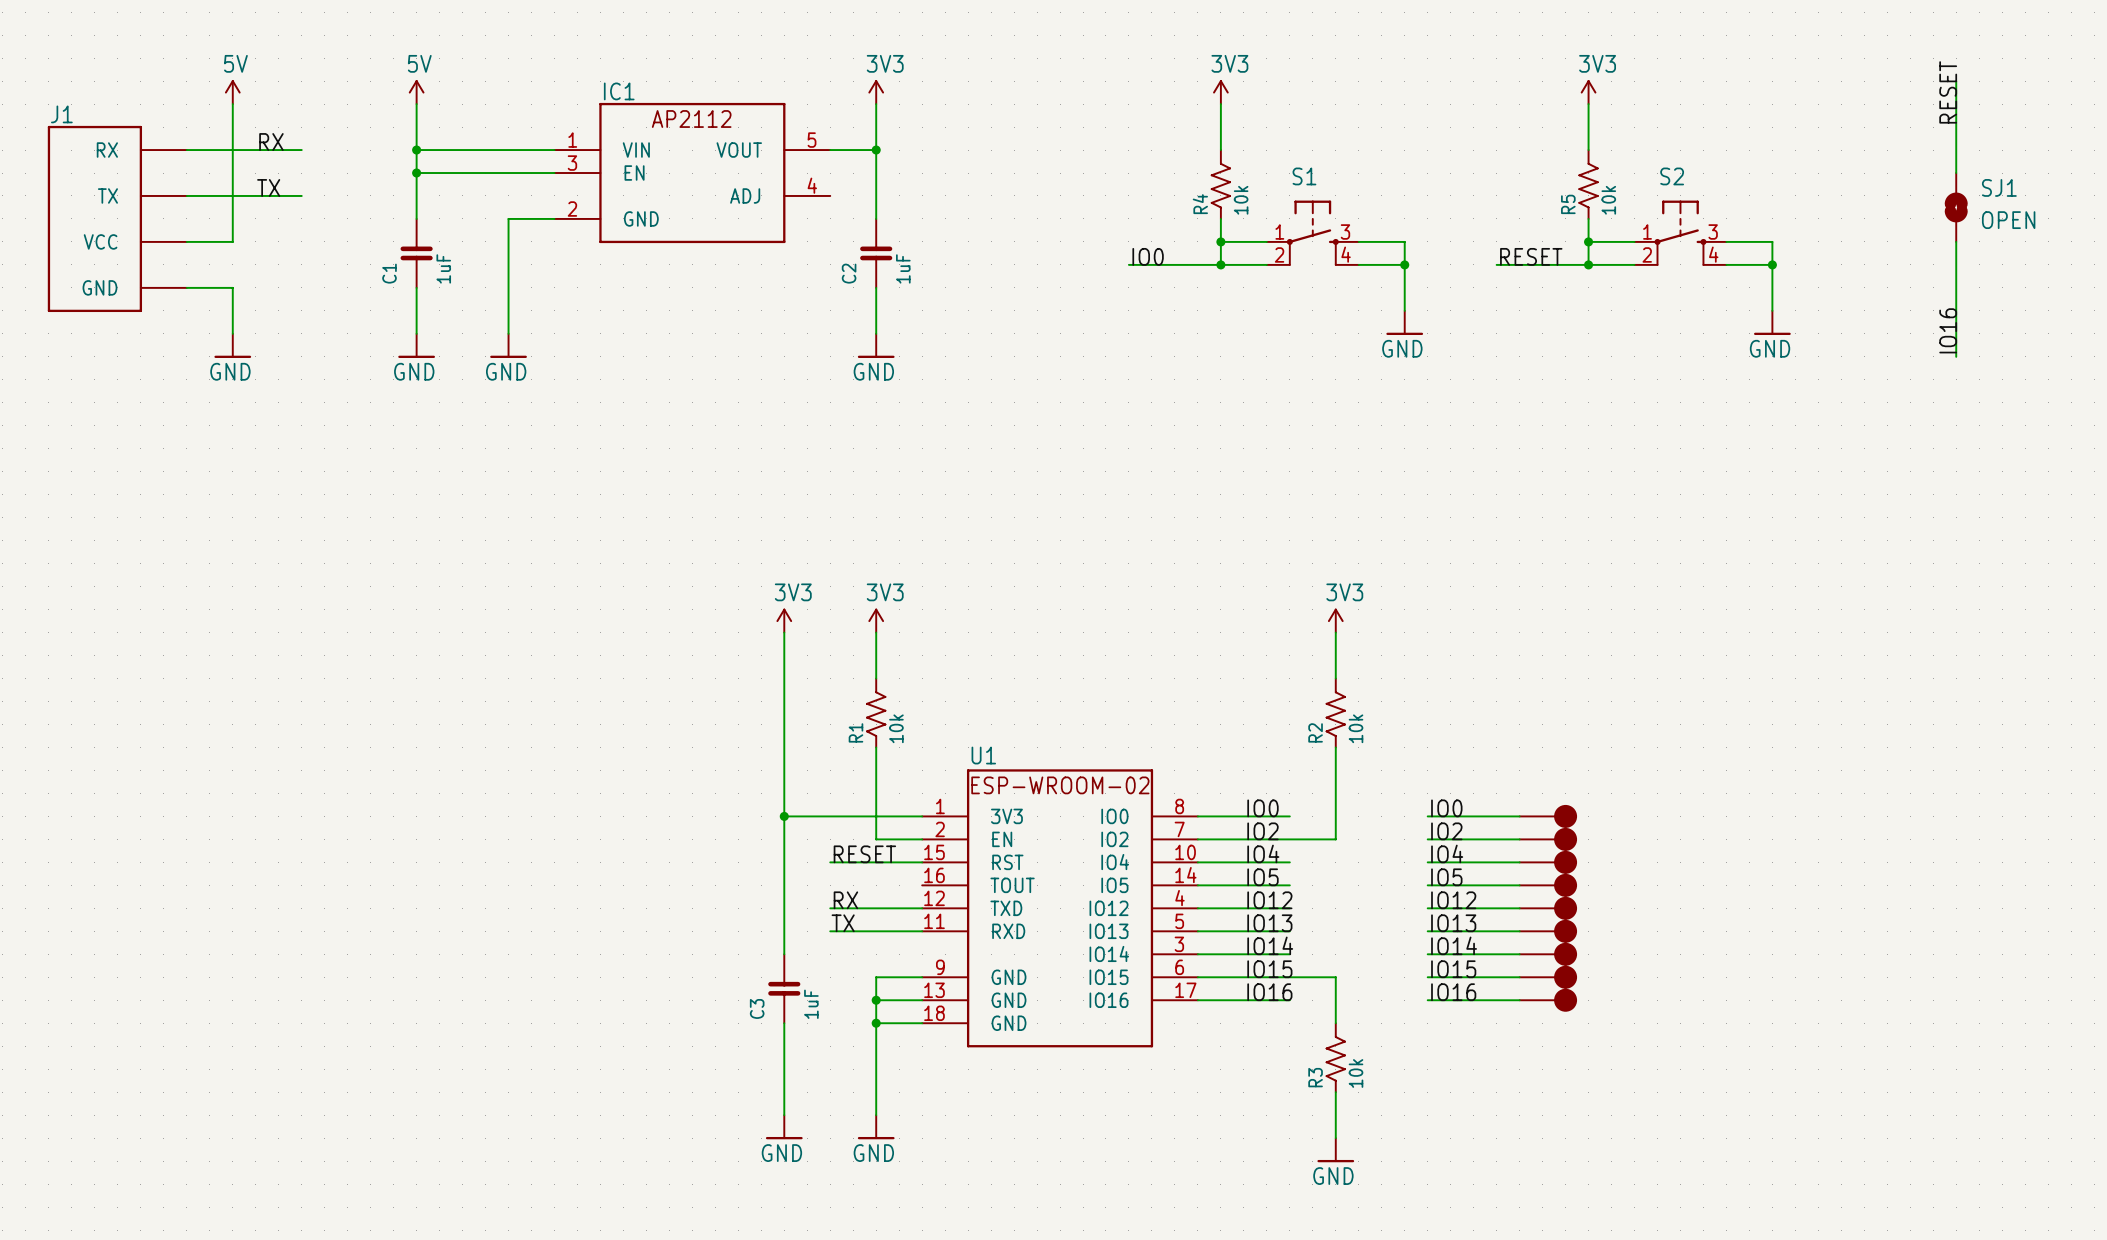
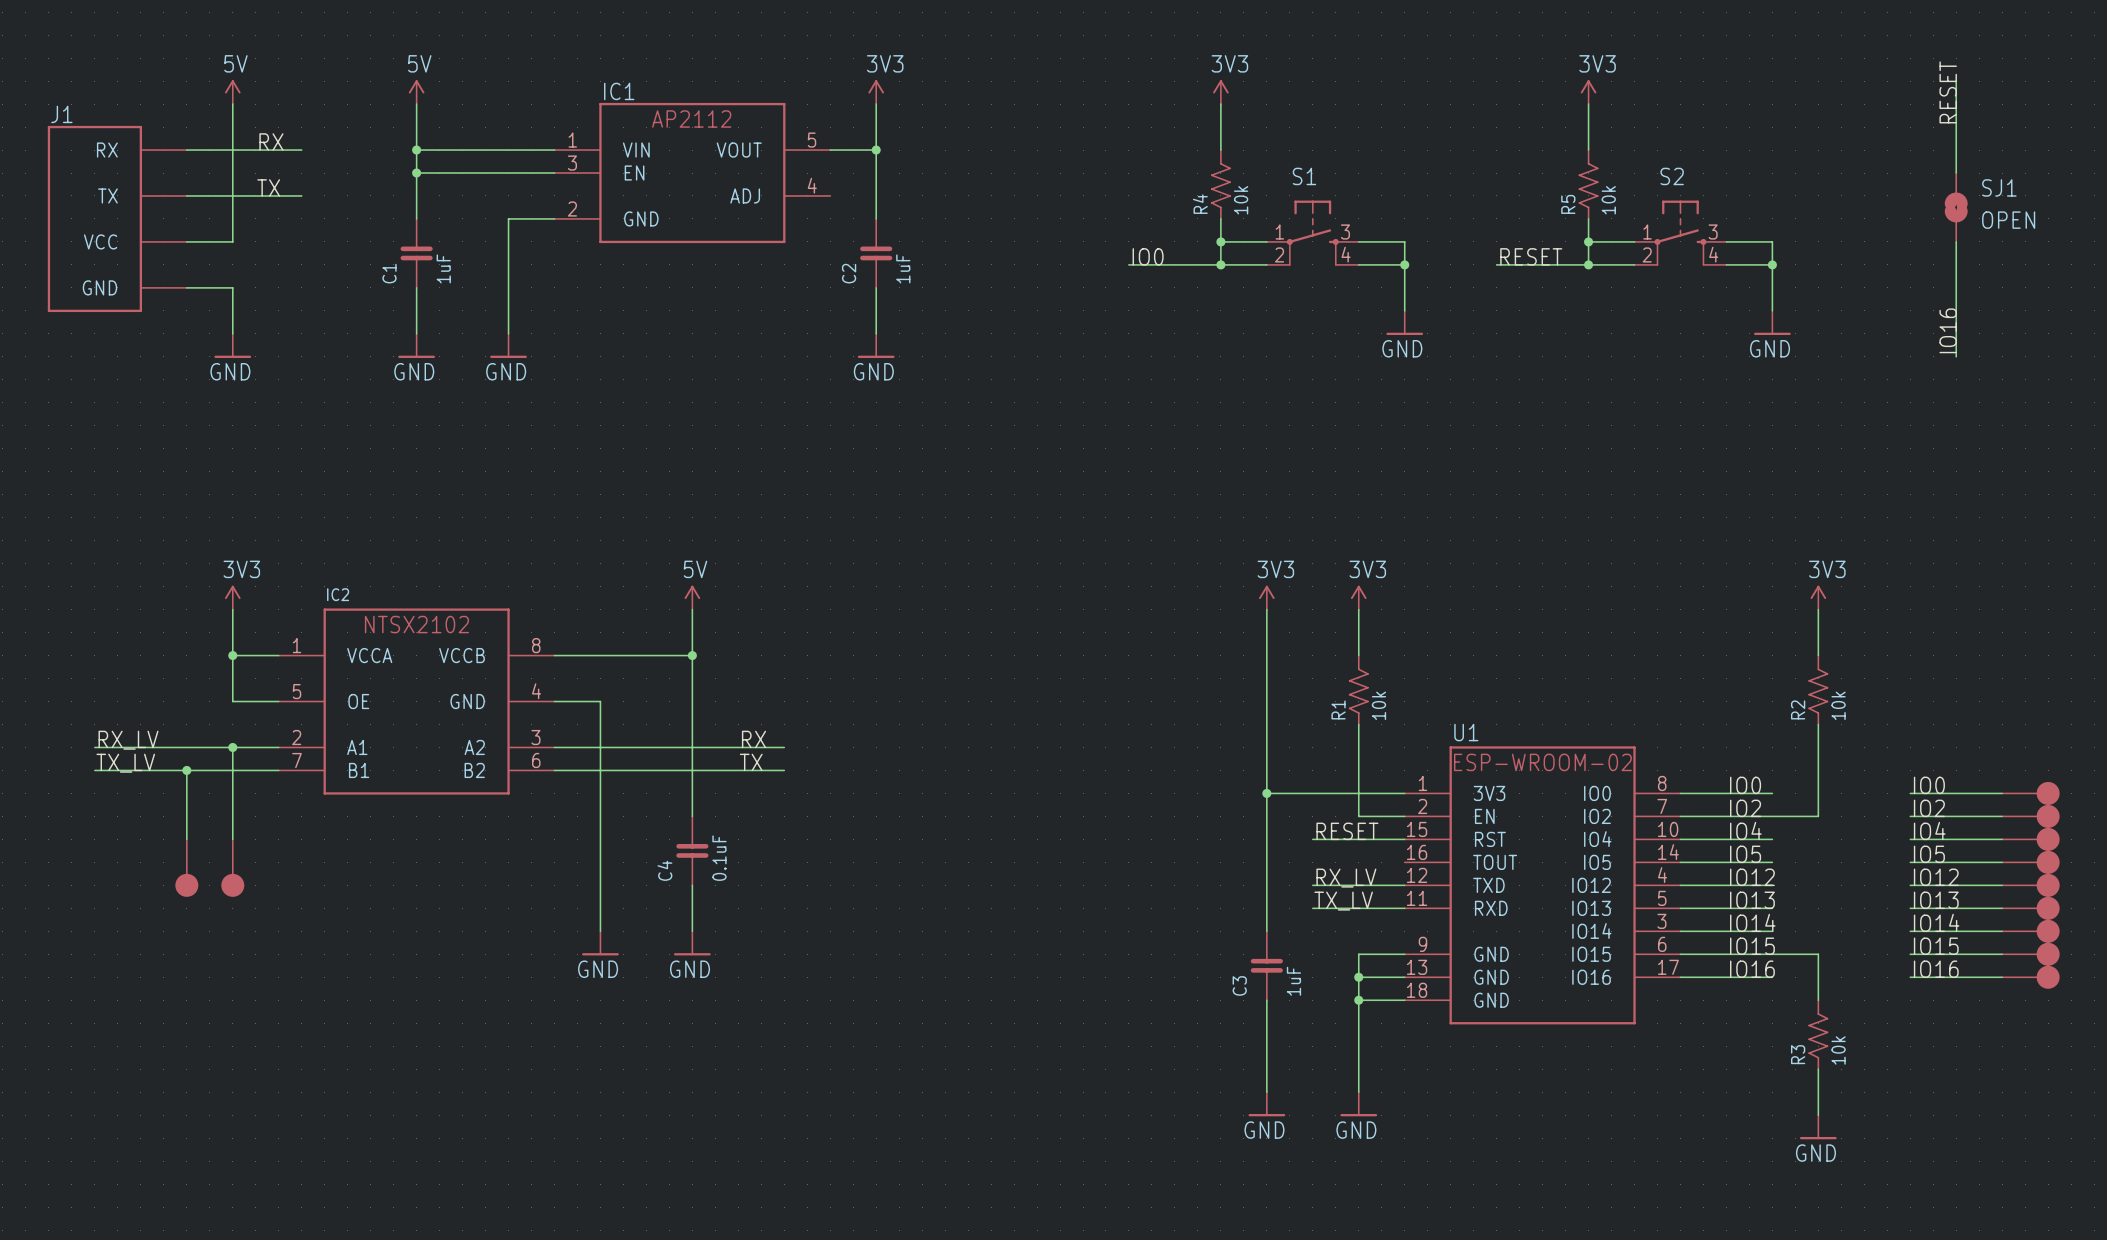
power symbol: none -> 3V3 (232, 597)
power symbol: none -> 5V (692, 597)
power symbol: none -> 3V3 (1266, 597)
power symbol: none -> 3V3 (1818, 597)
wire: none -> (232, 609) (232, 701) (278, 701)
wire: none -> (692, 609) (692, 816)
wire: none -> (1266, 609) (1266, 931)
wire: none -> (1818, 609) (1818, 655)
power symbol: 3V3 (784, 620) -> none
power symbol: 3V3 (876, 620) -> none
power symbol position: 3V3 (1335, 620) -> 3V3 (1358, 597)
wire: (784, 632) (784, 954) -> none
wire: (876, 632) (876, 678) -> none
wire: (1335, 632) (1335, 678) -> (1358, 609) (1358, 655)
wire: none -> (232, 655) (278, 655)
junction: none -> (232, 655)
wire: none -> (554, 655) (692, 655)
junction: none -> (692, 655)
IC2: none -> (416, 701)
wire: none -> (554, 701) (600, 701) (600, 931)
R1 position: (876, 713) -> (1358, 690)
R2 position: (1335, 713) -> (1818, 690)
wire: none -> (1358, 724) (1358, 816) (1404, 816)
wire: none -> (1818, 724) (1818, 816) (1680, 816)
label: none -> RX_LV (128, 740)
wire: none -> (94, 747) (278, 747)
wire: none -> (232, 747) (232, 839)
junction: none -> (232, 747)
wire: none -> (554, 747) (784, 747)
wire: (876, 747) (876, 839) (922, 839) -> none
wire: (1335, 747) (1335, 839) -> (1404, 839) (1335, 839)
label: none -> TX_LV (125, 763)
wire: none -> (94, 770) (278, 770)
wire: none -> (186, 770) (186, 839)
junction: none -> (186, 770)
wire: none -> (554, 770) (784, 770)
label: none -> IO0 (1745, 785)
label: none -> IO0 (1929, 785)
wire: none -> (1266, 793) (1404, 793)
junction: none -> (1266, 793)
wire: none -> (1680, 793) (1772, 793)
wire: none -> (1910, 793) (2002, 793)
part: none -> (2030, 793)
label: IO0 (1262, 808) -> none
label: IO0 (1446, 808) -> none
label: none -> IO2 (1745, 808)
label: none -> IO2 (1929, 808)
wire: (784, 816) (922, 816) -> none
junction: (784, 816) -> none
wire: (1197, 816) (1289, 816) -> none
wire: (1427, 816) (1519, 816) -> none
part: (1548, 816) -> none
wire: none -> (1910, 816) (2002, 816)
part: none -> (2030, 816)
label: none -> IO4 (1745, 830)
label: none -> IO4 (1929, 830)
label: IO2 (1262, 831) -> none
label: none -> RESET (1347, 831)
label: IO2 (1446, 831) -> none
wire: (1197, 839) (1312, 839) -> none
wire: (1427, 839) (1519, 839) -> none
part: (1548, 839) -> none
wire: none -> (1680, 839) (1772, 839)
wire: none -> (1910, 839) (2002, 839)
part: none -> (2030, 839)
C4: none -> 0.1uF (692, 850)
label: IO4 (1263, 853) -> none
label: IO4 (1447, 853) -> none
label: RESET (864, 854) -> none
label: none -> IO5 (1745, 854)
label: none -> IO5 (1929, 854)
wire: (830, 862) (922, 862) -> none
wire: (1197, 862) (1289, 862) -> none
wire: (1427, 862) (1519, 862) -> none
part: (1548, 862) -> none
wire: none -> (1680, 862) (1772, 862)
wire: none -> (1910, 862) (2002, 862)
part: none -> (2030, 862)
part: none -> (186, 868)
part: none -> (232, 868)
label: IO5 (1262, 877) -> none
label: IO5 (1446, 877) -> none
label: none -> IO12 (1752, 877)
label: none -> IO12 (1936, 877)
label: none -> RX_LV (1346, 878)
wire: none -> (692, 885) (692, 931)
wire: (1197, 885) (1289, 885) -> (1312, 885) (1404, 885)
wire: (1427, 885) (1519, 885) -> none
part: (1548, 885) -> none
wire: none -> (1680, 885) (1772, 885)
wire: none -> (1910, 885) (2002, 885)
part: none -> (2030, 885)
label position: RX (845, 900) -> RX (754, 739)
label: IO12 (1269, 900) -> none
label: IO12 (1453, 900) -> none
label: none -> IO13 (1752, 900)
label: none -> IO13 (1936, 900)
label: none -> TX_LV (1343, 901)
wire: (830, 908) (922, 908) -> none
U1 position: (1060, 908) -> (1542, 885)
wire: (1197, 908) (1289, 908) -> (1312, 908) (1404, 908)
wire: (1427, 908) (1519, 908) -> none
part: (1548, 908) -> none
wire: none -> (1680, 908) (1772, 908)
wire: none -> (1910, 908) (2002, 908)
part: none -> (2030, 908)
label: none -> IO14 (1752, 922)
label: none -> IO14 (1936, 922)
label position: TX (843, 923) -> TX (751, 762)
label: IO13 (1269, 923) -> none
label: IO13 (1453, 923) -> none
wire: (830, 931) (922, 931) -> none
wire: (1197, 931) (1289, 931) -> none
wire: (1427, 931) (1519, 931) -> none
part: (1548, 931) -> none
wire: none -> (1680, 931) (1772, 931)
wire: none -> (1910, 931) (2002, 931)
part: none -> (2030, 931)
power symbol: none -> GND (600, 943)
power symbol: none -> GND (692, 943)
label: IO14 (1270, 945) -> none
label: IO14 (1454, 945) -> none
label: none -> IO15 (1752, 946)
label: none -> IO15 (1936, 946)
wire: (1197, 954) (1289, 954) -> none
wire: none -> (1404, 954) (1358, 954) (1358, 1092)
wire: (1427, 954) (1519, 954) -> none
part: (1548, 954) -> none
wire: none -> (1680, 954) (1818, 954) (1818, 1000)
wire: none -> (1910, 954) (2002, 954)
part: none -> (2030, 954)
label: IO15 (1269, 969) -> none
label: IO15 (1453, 969) -> none
label: none -> IO16 (1752, 969)
label: none -> IO16 (1936, 969)
wire: (922, 977) (876, 977) (876, 1115) -> none
wire: (1197, 977) (1335, 977) (1335, 1023) -> none
wire: none -> (1358, 977) (1404, 977)
junction: none -> (1358, 977)
wire: (1427, 977) (1519, 977) -> none
part: (1548, 977) -> none
wire: none -> (1680, 977) (1772, 977)
wire: none -> (1910, 977) (2002, 977)
part: none -> (2030, 977)
C3 position: (784, 988) -> (1266, 965)
label: IO16 (1269, 992) -> none
label: IO16 (1453, 992) -> none
wire: (876, 1000) (922, 1000) -> none
junction: (876, 1000) -> none
wire: (1197, 1000) (1289, 1000) -> none
wire: none -> (1266, 1000) (1266, 1092)
wire: none -> (1358, 1000) (1404, 1000)
junction: none -> (1358, 1000)
wire: (1427, 1000) (1519, 1000) -> none
part: (1548, 1000) -> none
wire: (784, 1023) (784, 1115) -> none
wire: (876, 1023) (922, 1023) -> none
junction: (876, 1023) -> none
R3 position: (1335, 1057) -> (1818, 1034)
wire: none -> (1818, 1069) (1818, 1115)
wire: (1335, 1092) (1335, 1138) -> none
power symbol: none -> GND (1266, 1104)
power symbol: none -> GND (1358, 1104)
power symbol: GND (784, 1127) -> none
power symbol: GND (876, 1127) -> none
power symbol: none -> GND (1818, 1127)
power symbol: GND (1335, 1150) -> none

